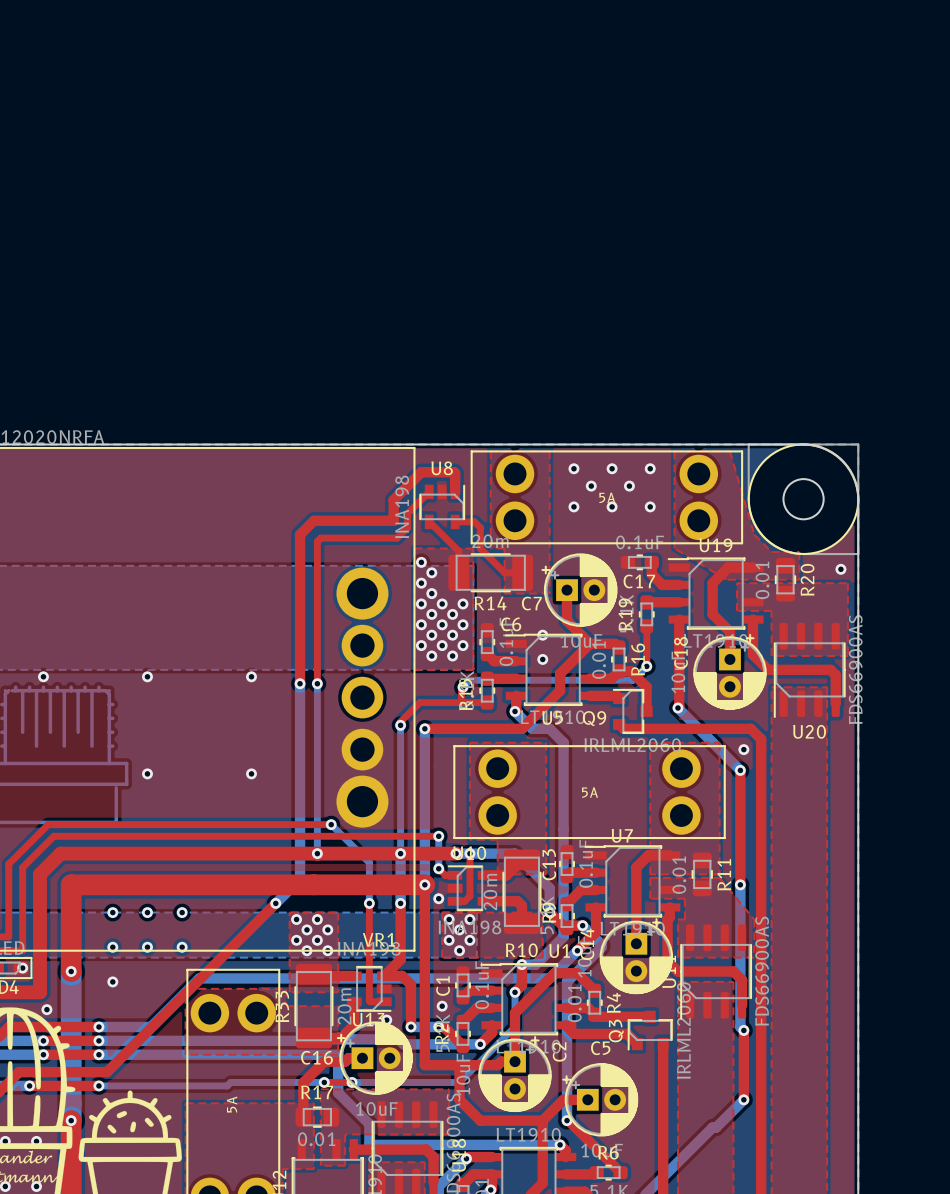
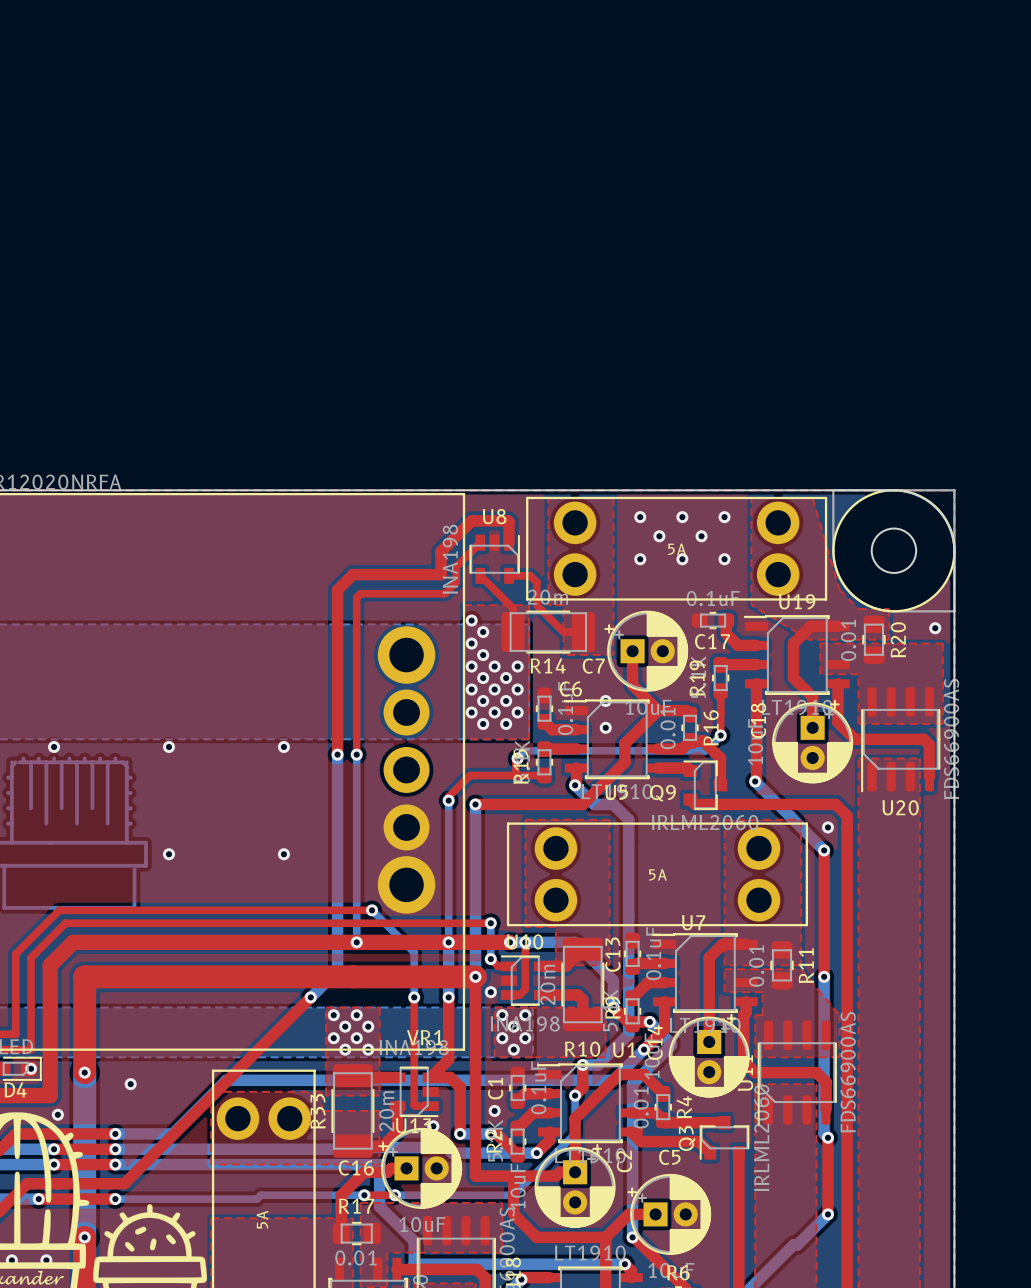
via: (112, 912) -> none
via: (147, 912) -> none
via: (182, 912) -> none
via: (112, 947) -> none
via: (147, 947) -> none
via: (182, 947) -> none

